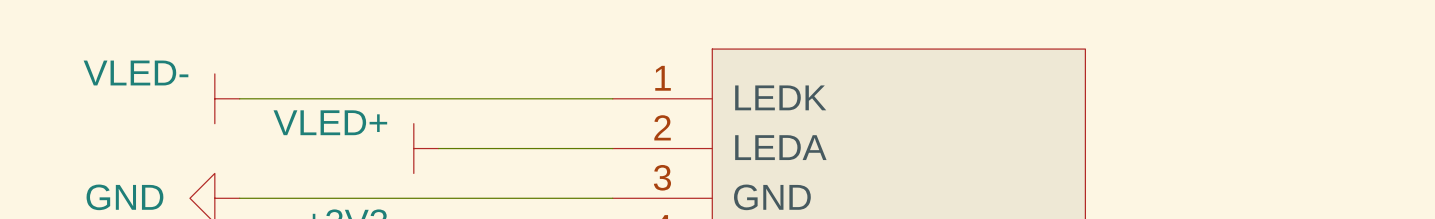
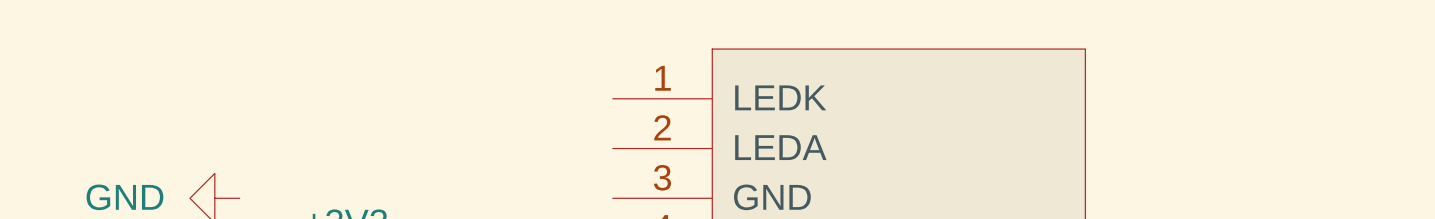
power symbol: VLED- (227, 98) -> none
wire: (239, 98) (612, 98) -> none
power symbol: VLED+ (426, 148) -> none
wire: (438, 148) (612, 148) -> none
wire: (239, 198) (612, 198) -> none

